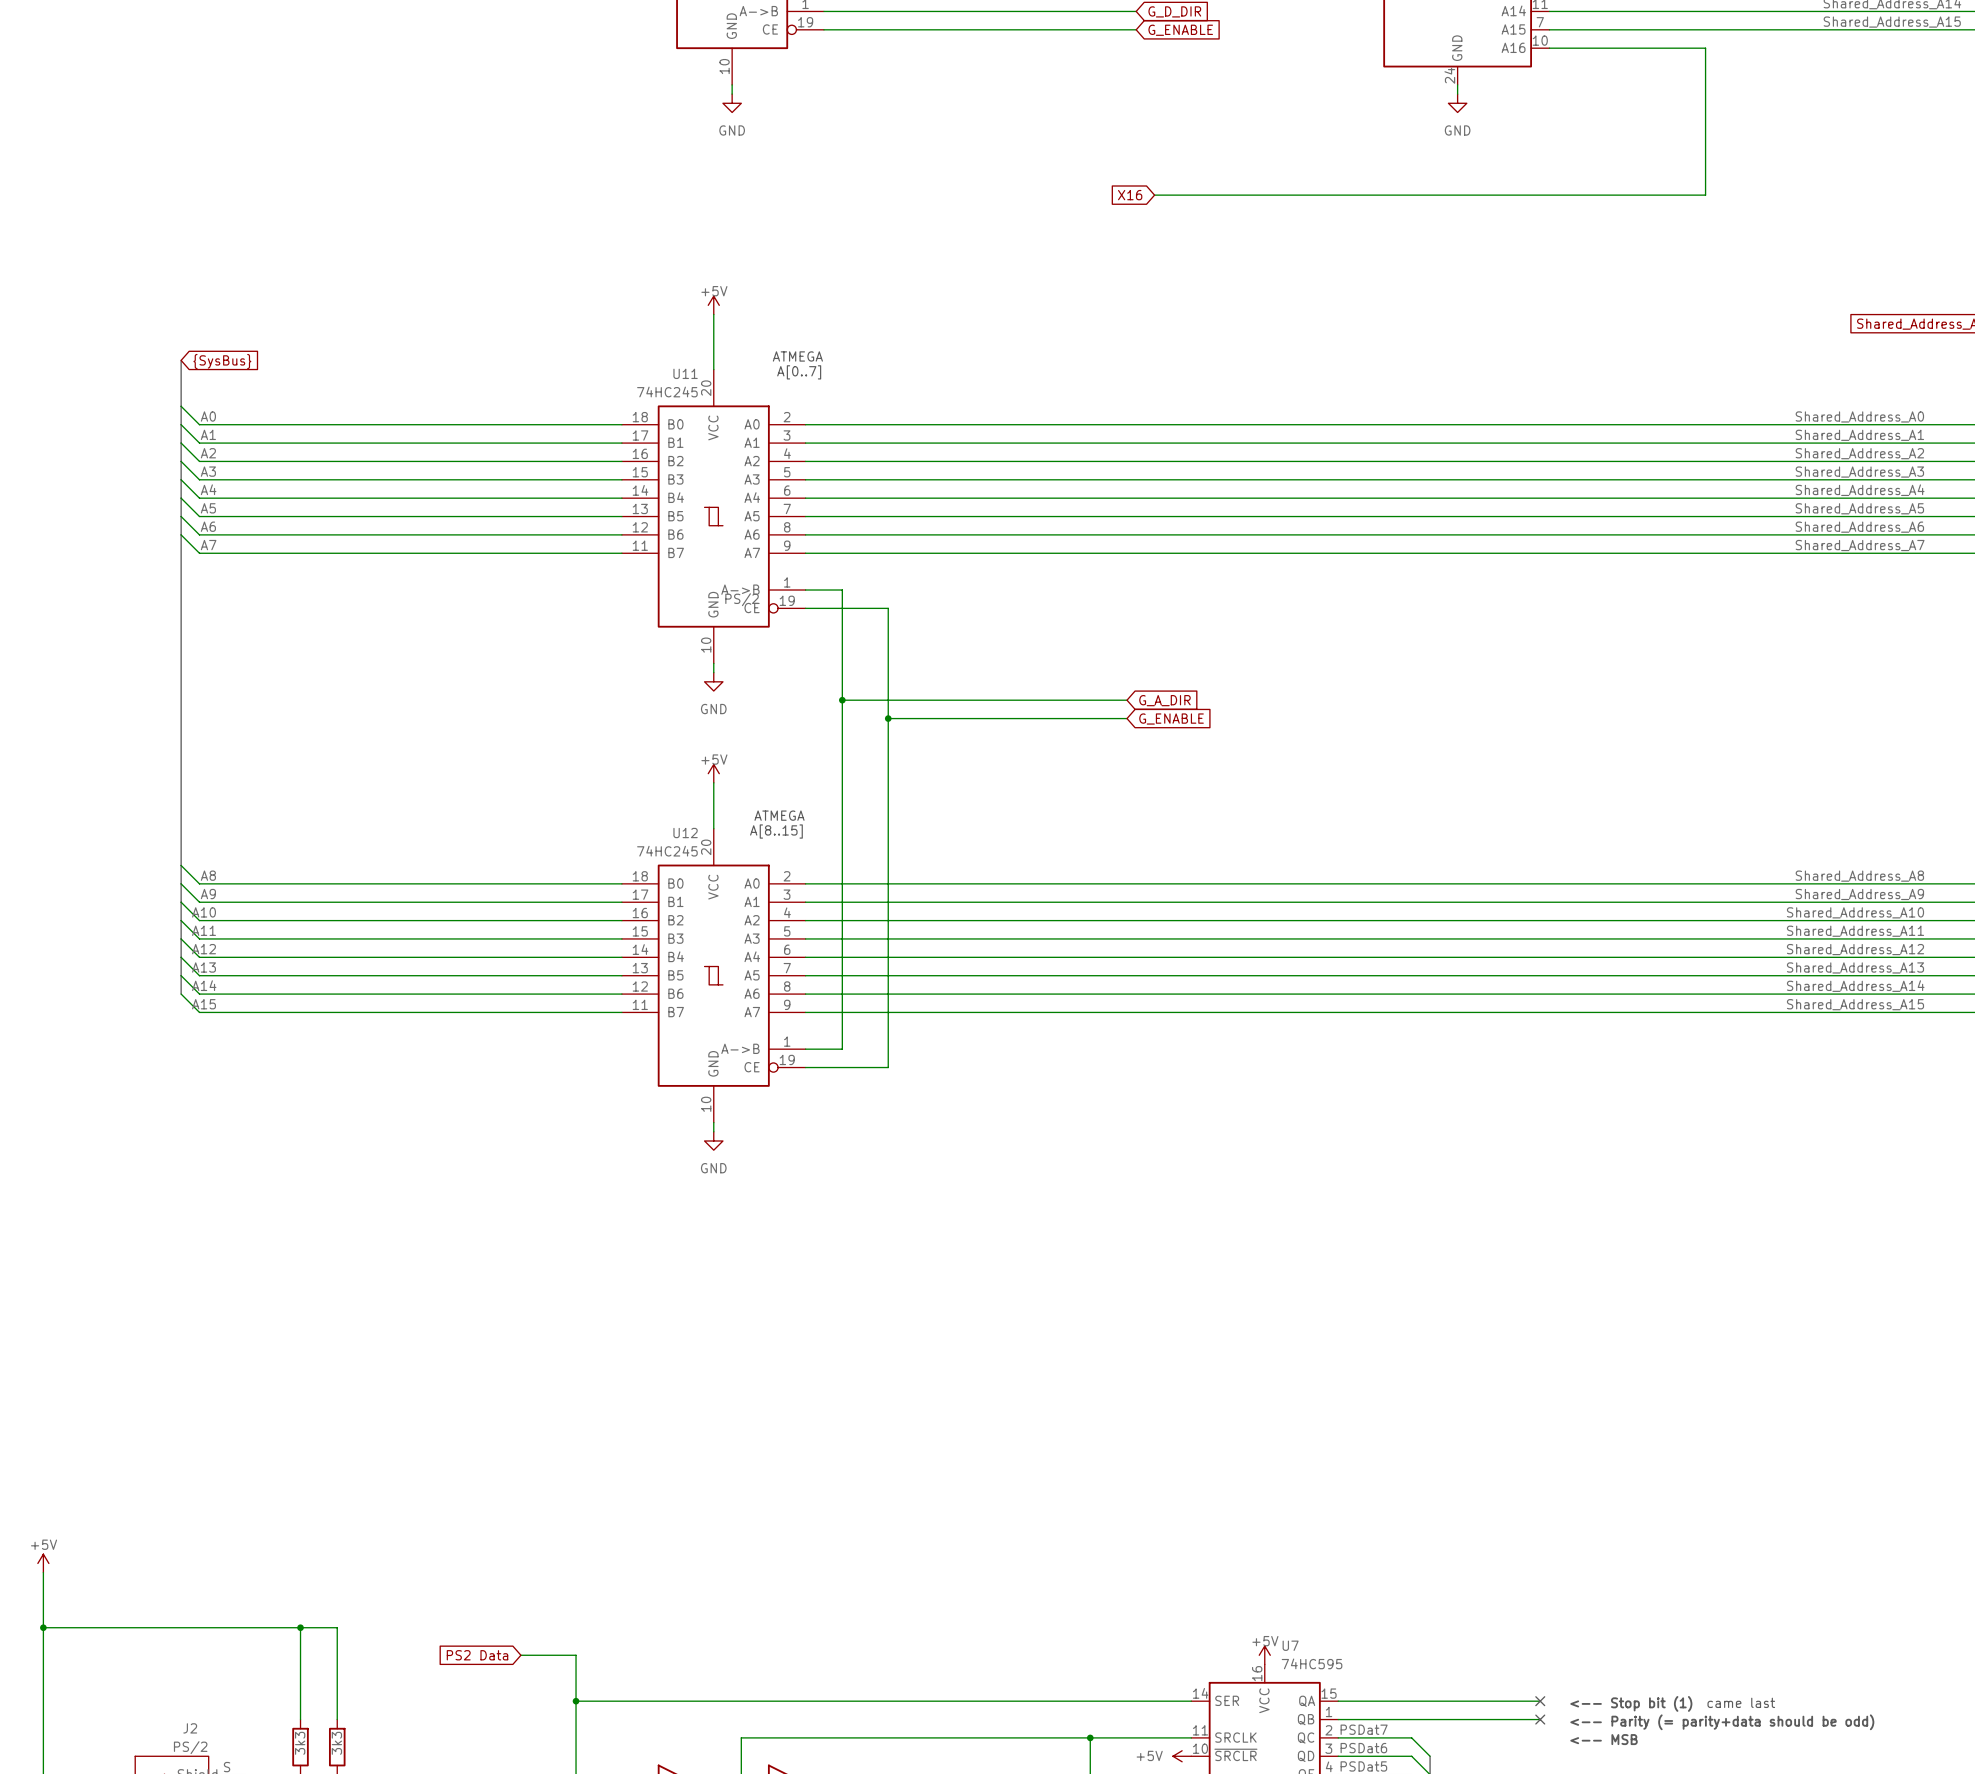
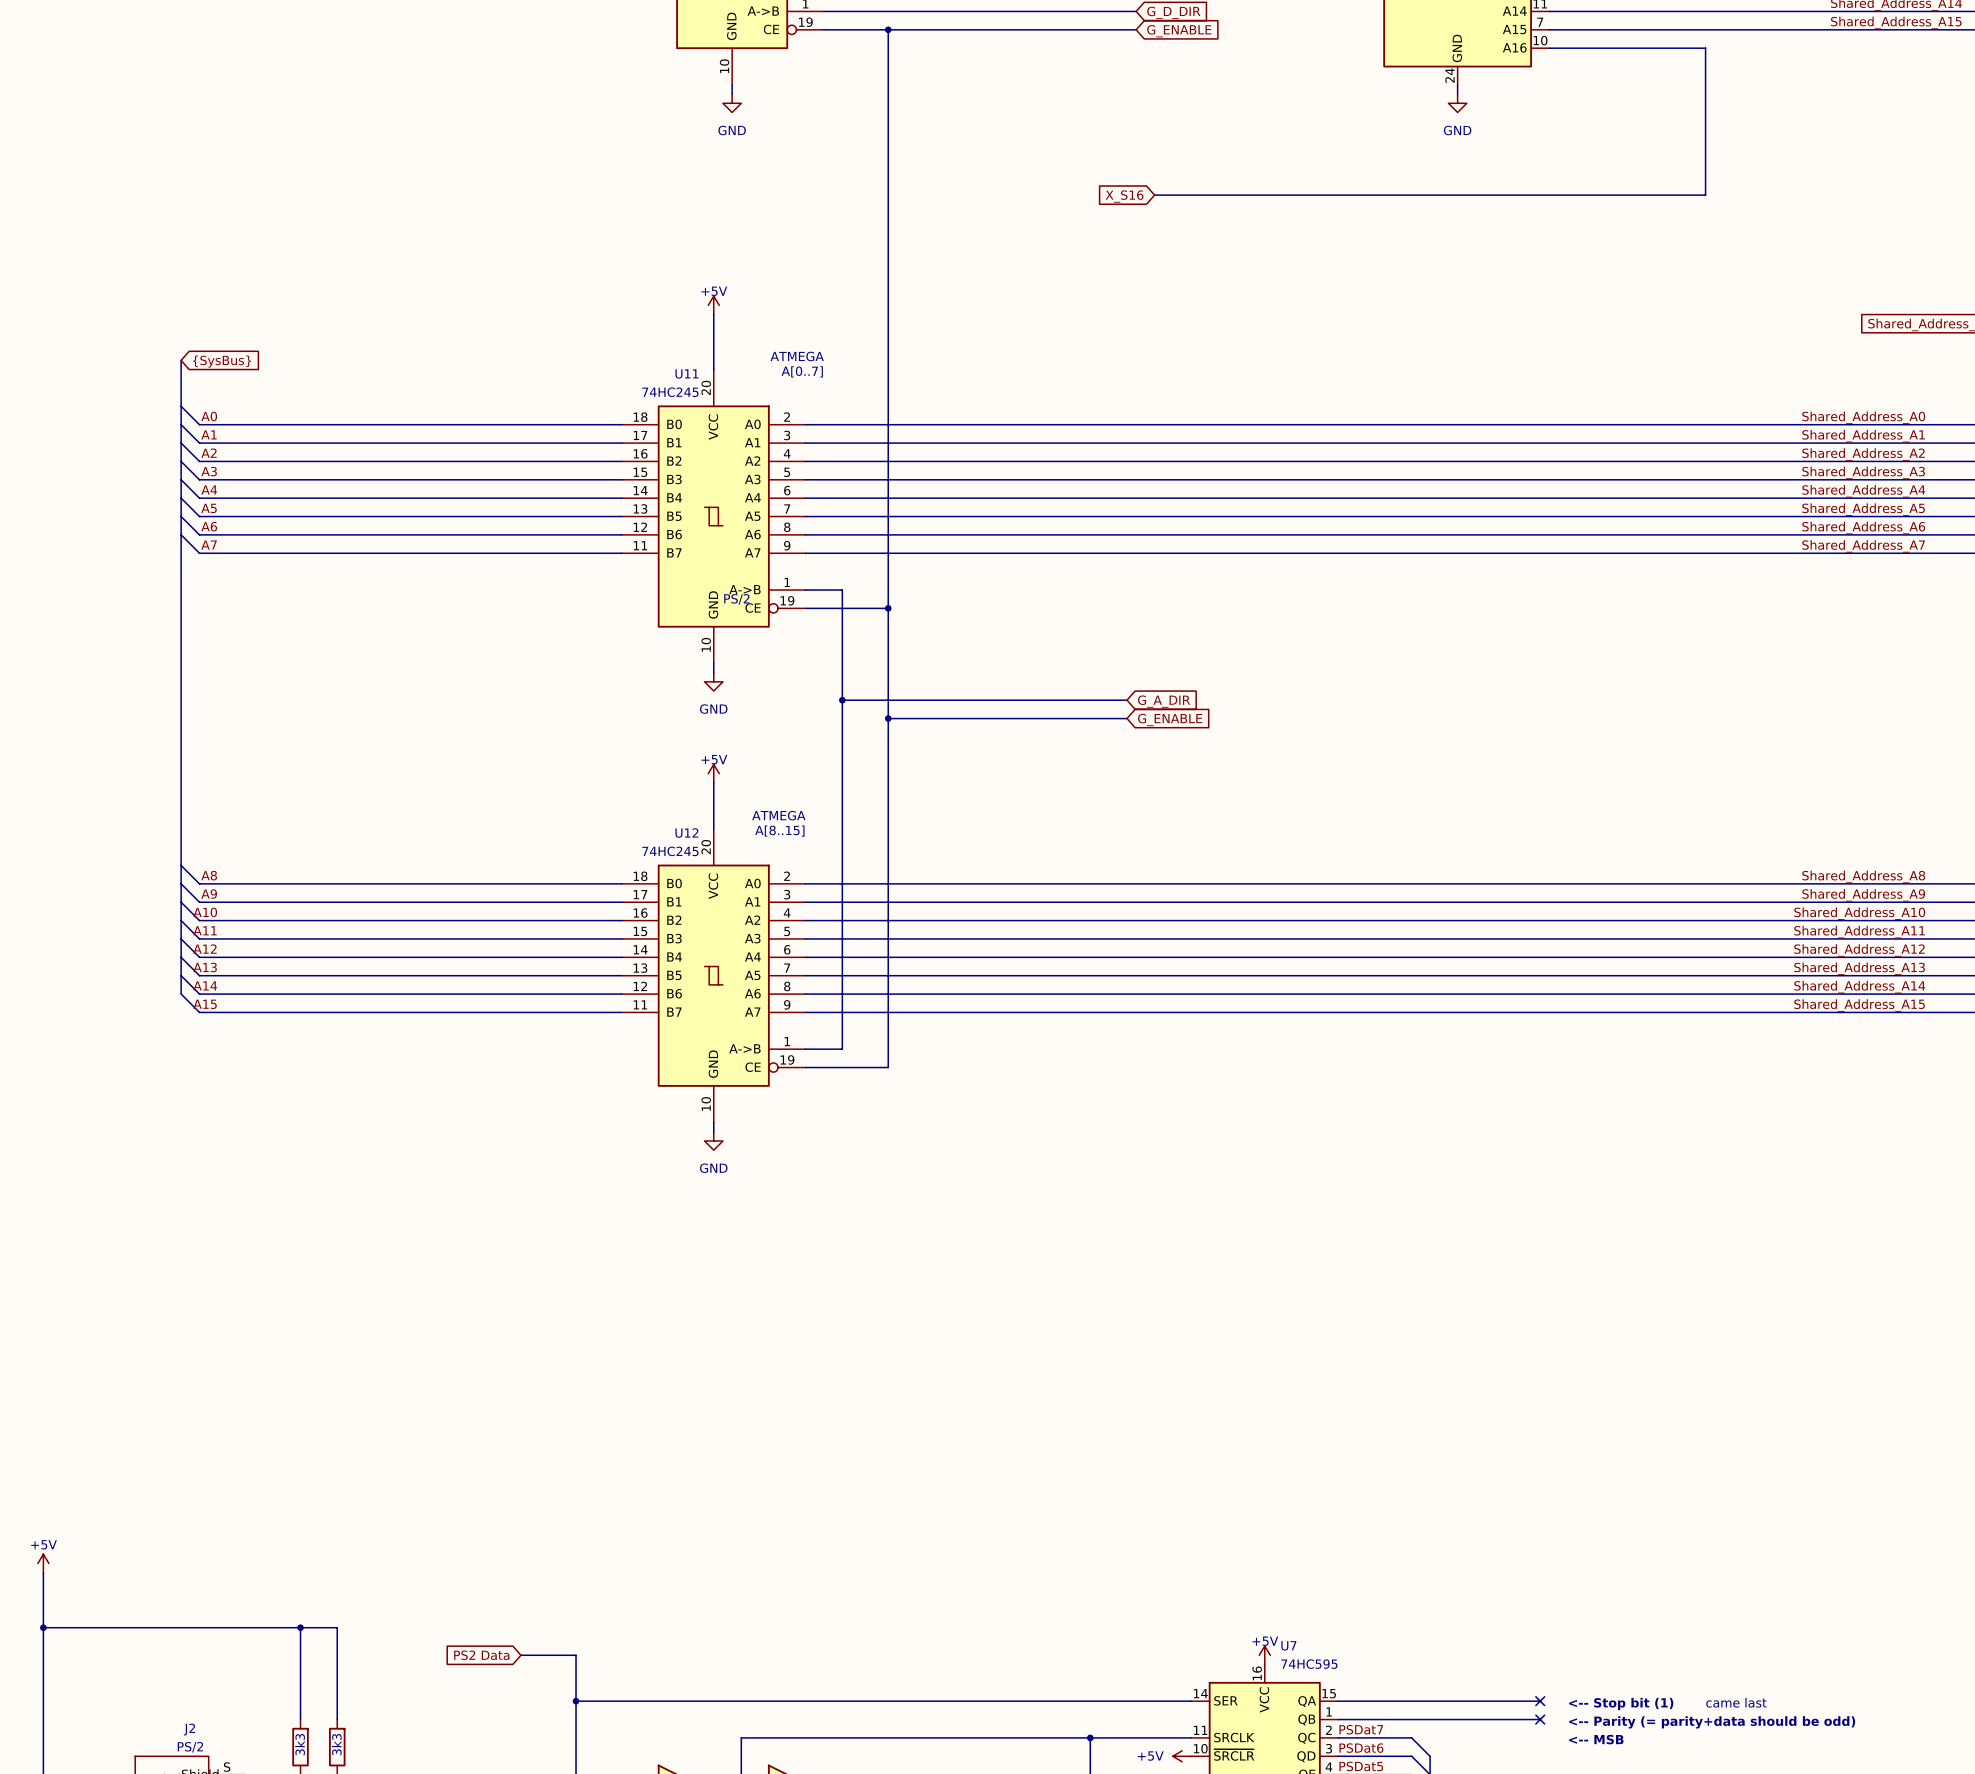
wire: none -> (888, 29) (888, 608)
junction: none -> (888, 29)
global label: X16 (1130, 195) -> X_S16 (1124, 196)
junction: none -> (888, 608)

